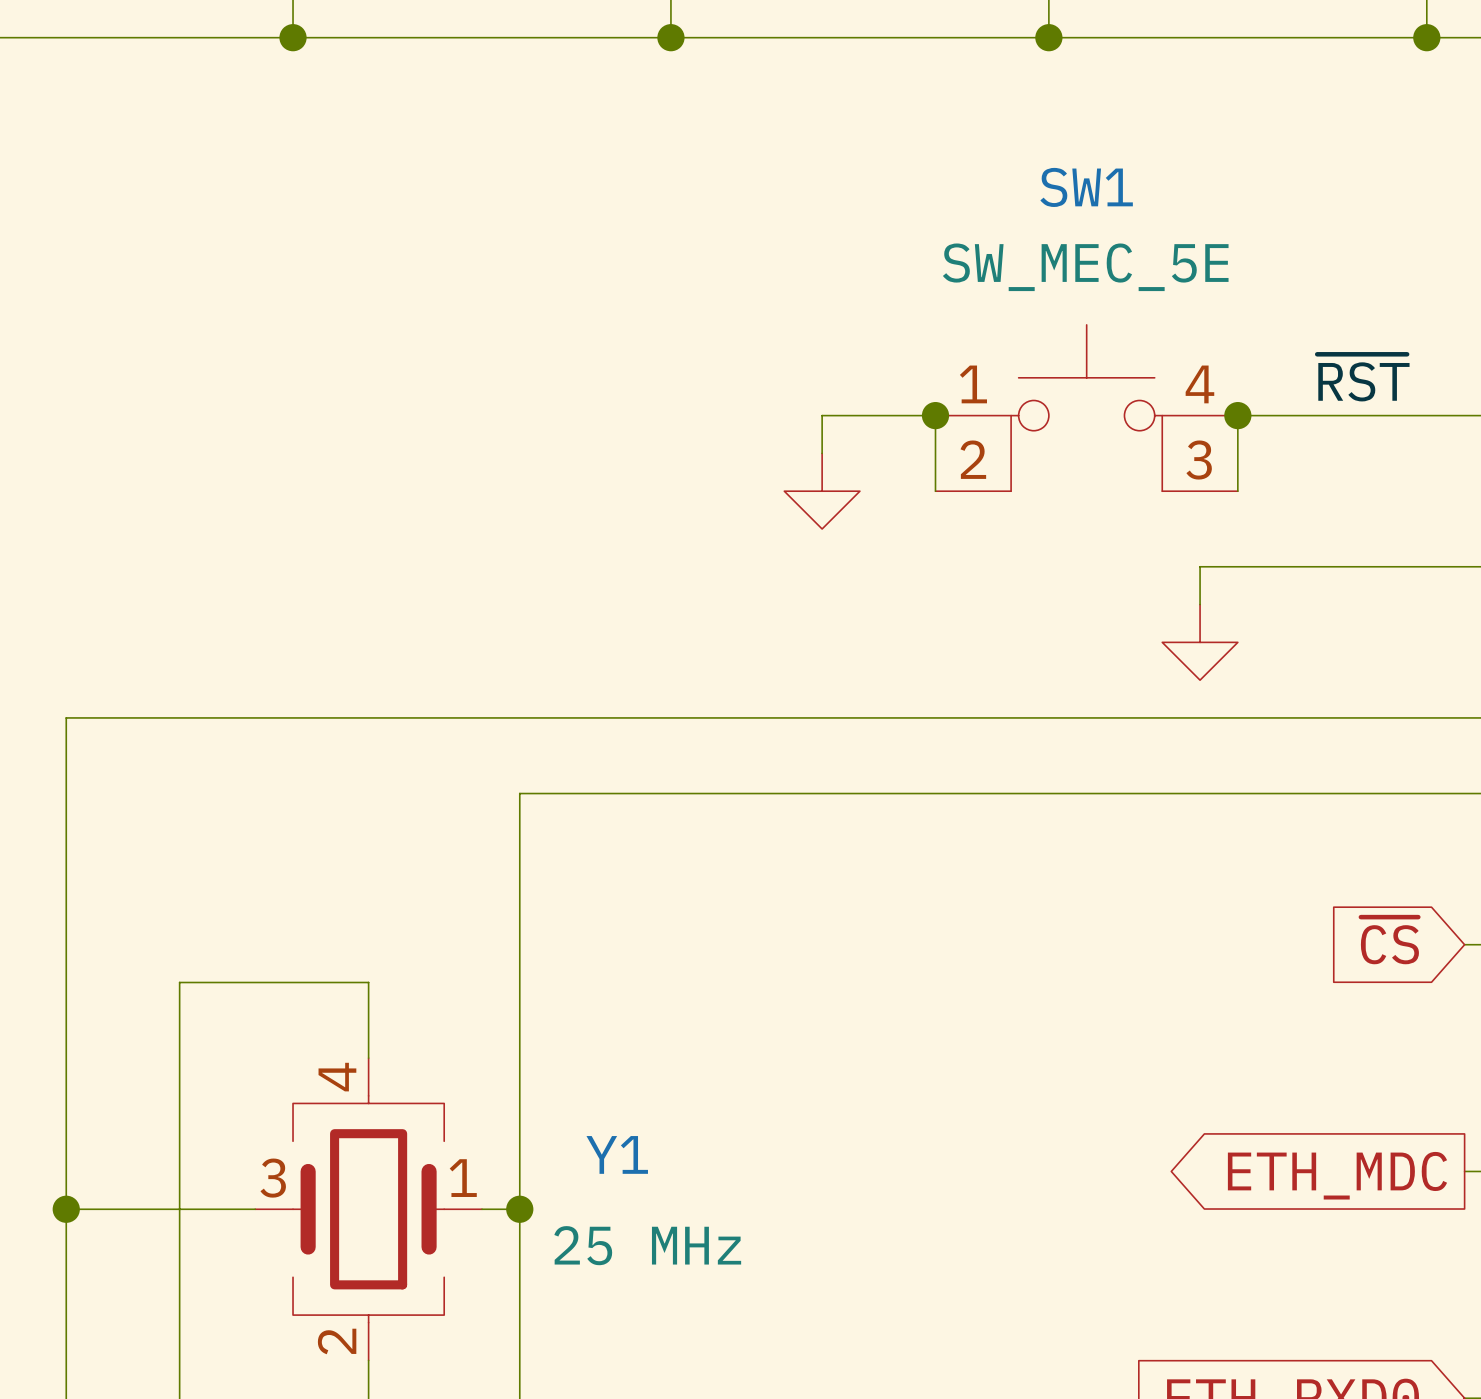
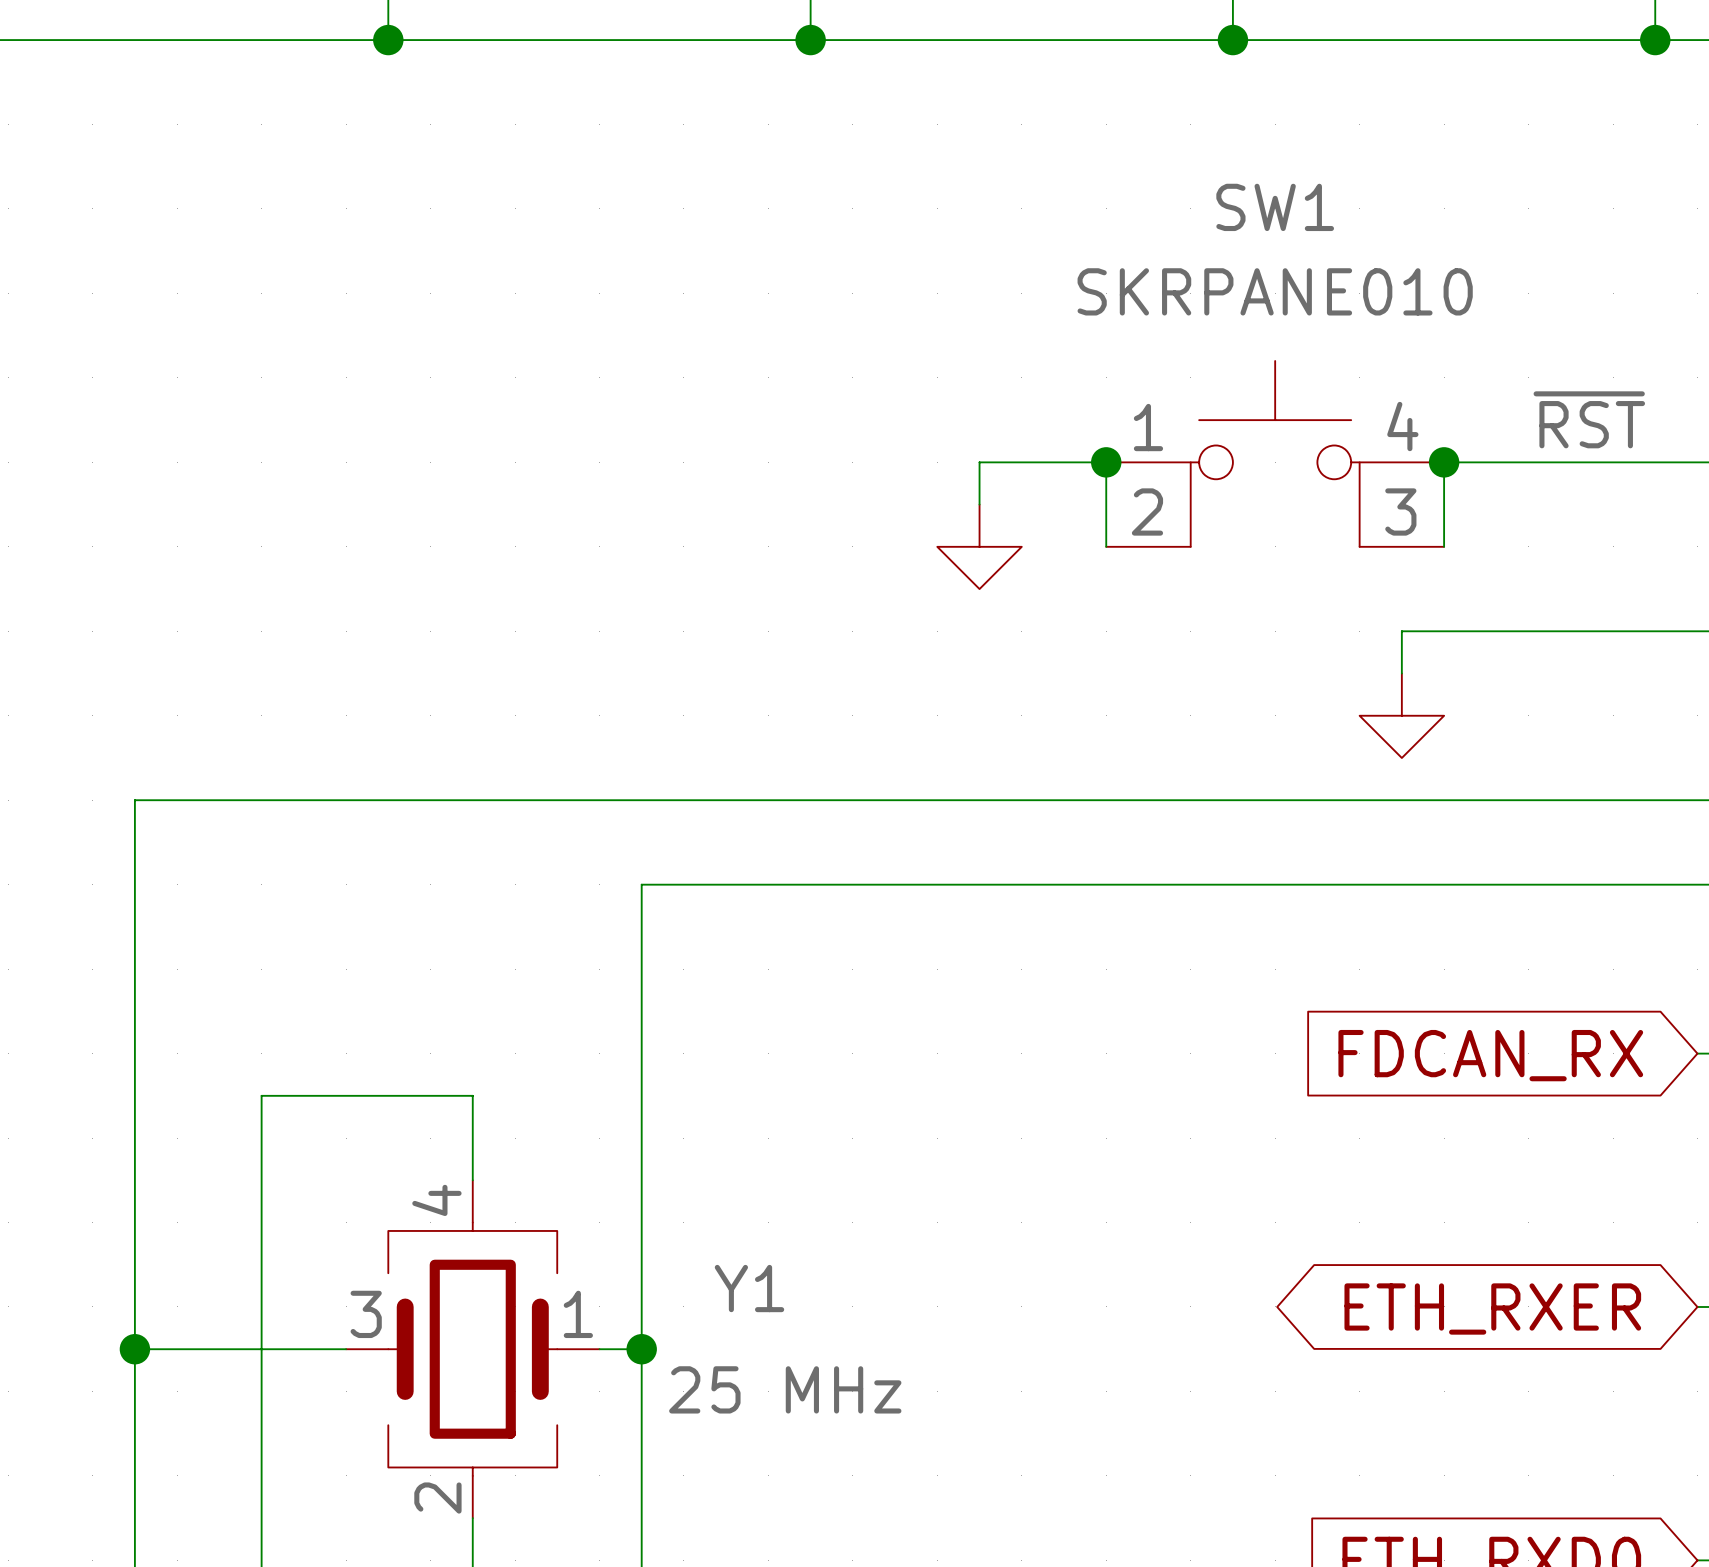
SW1 value: SW_MEC_5E (1085, 267) -> SKRPANE010 (1275, 291)
global label: ~{CS} (1389, 940) -> FDCAN_RX (1490, 1055)
global label shape: output (1337, 1175) -> bidirectional (1492, 1309)
global label: ETH_MDC (1337, 1175) -> ETH_RXER (1492, 1309)

